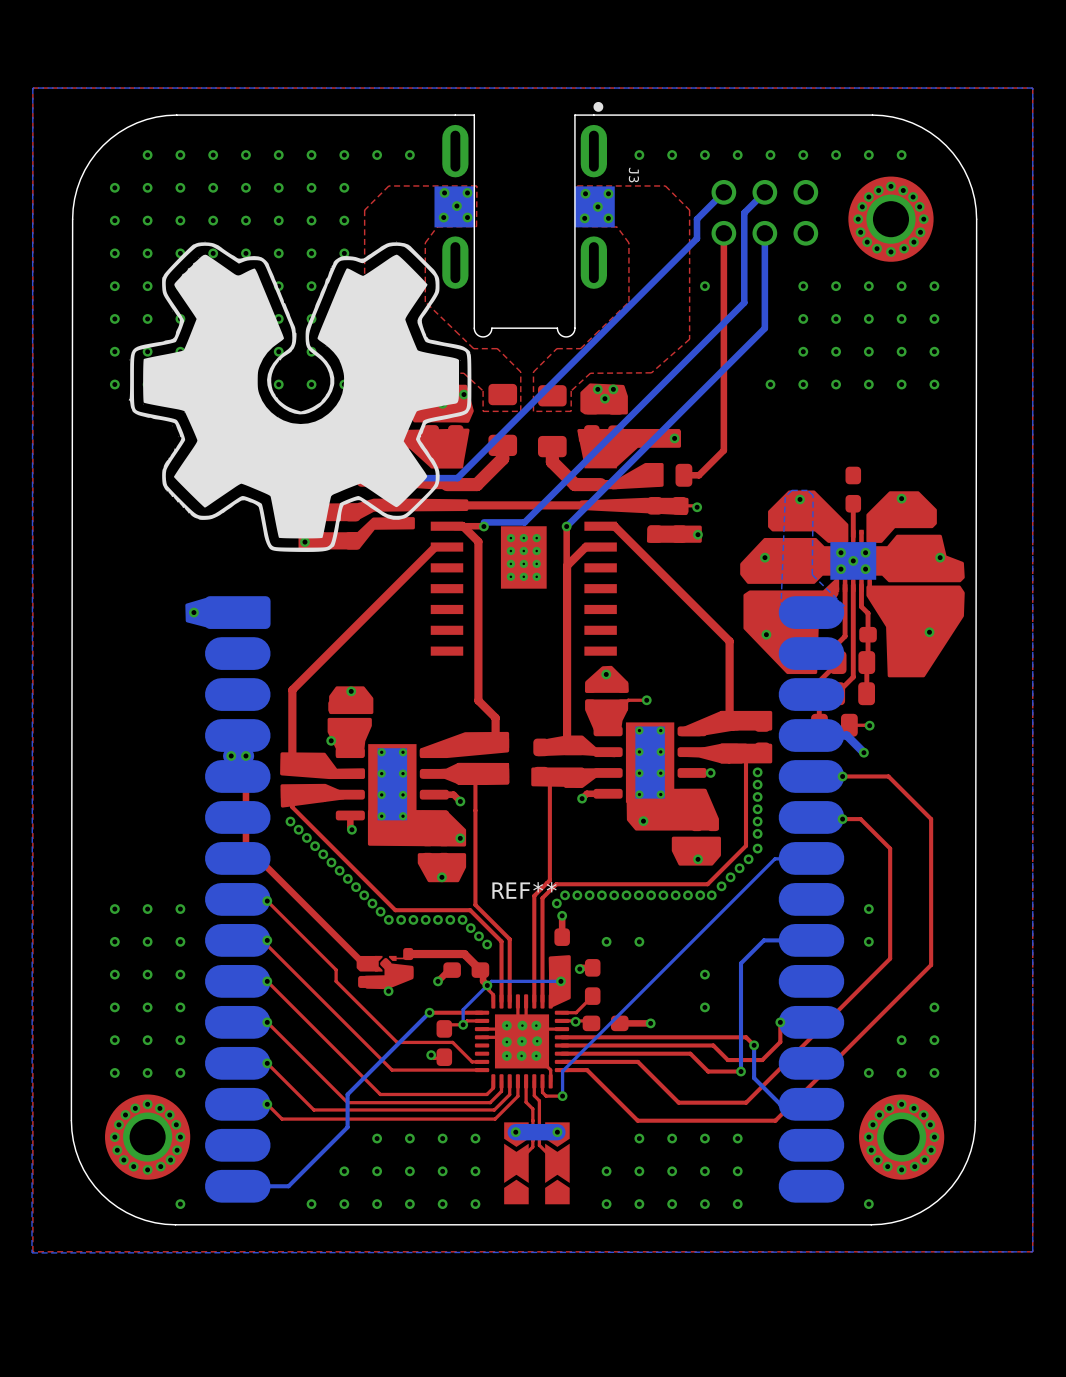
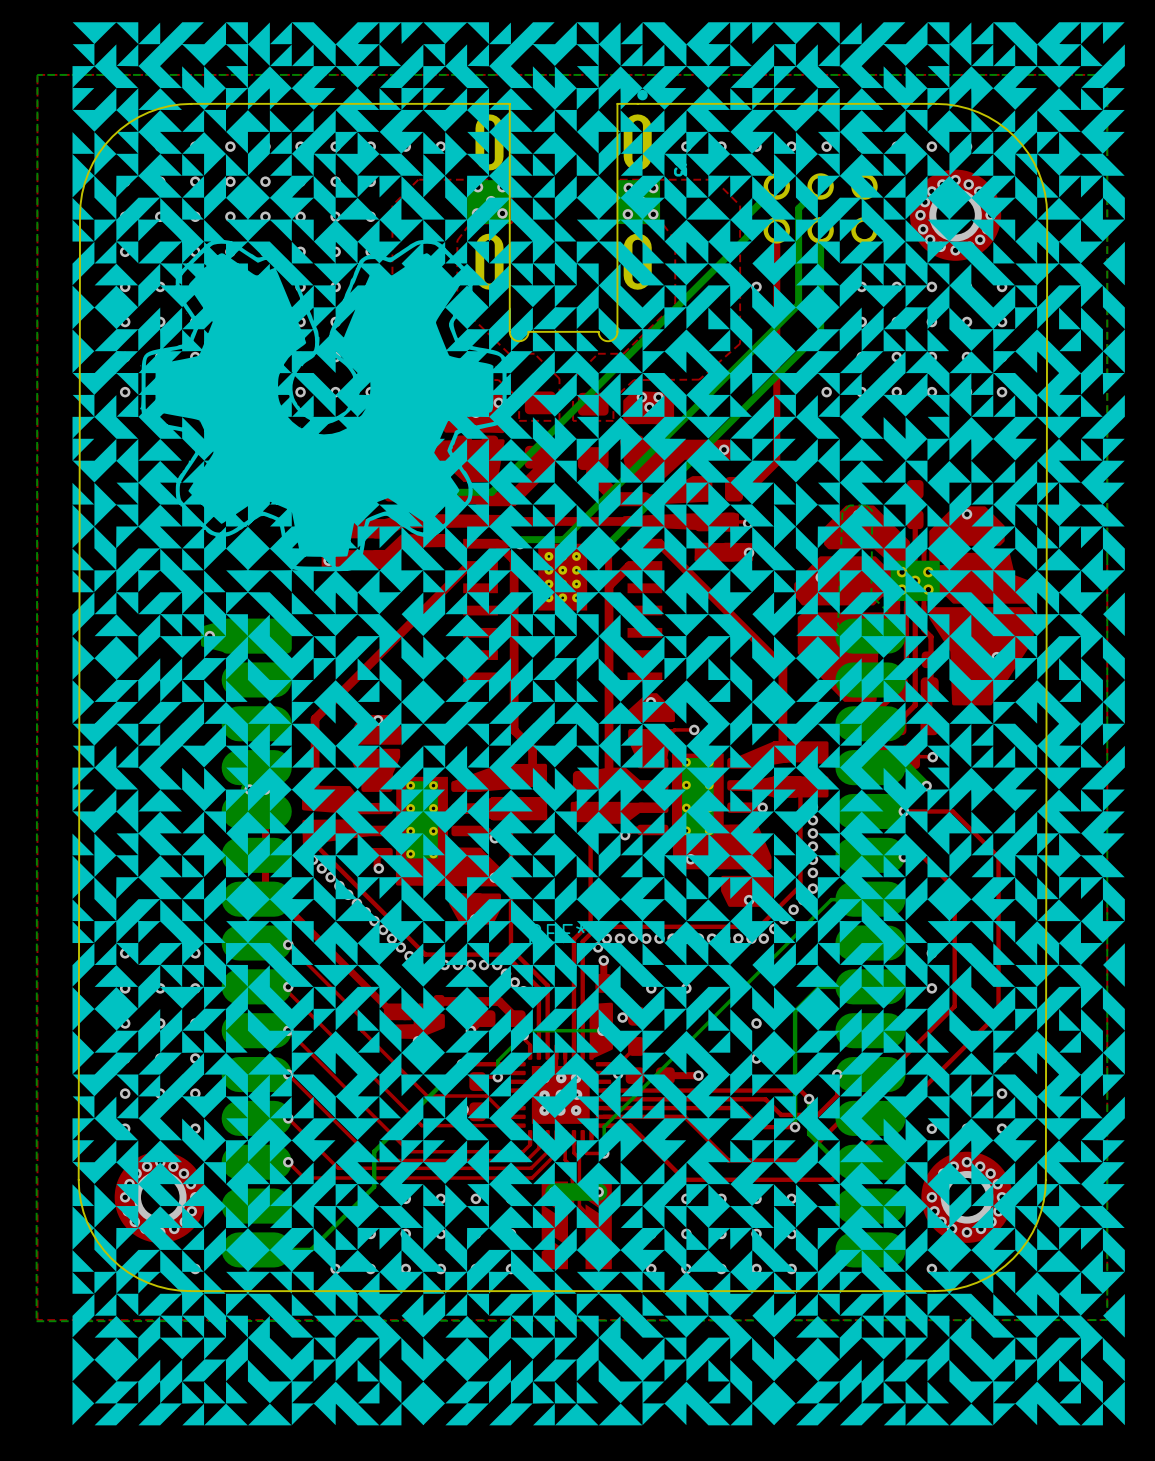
drawing: none -> [72, 22, 1125, 1426]

